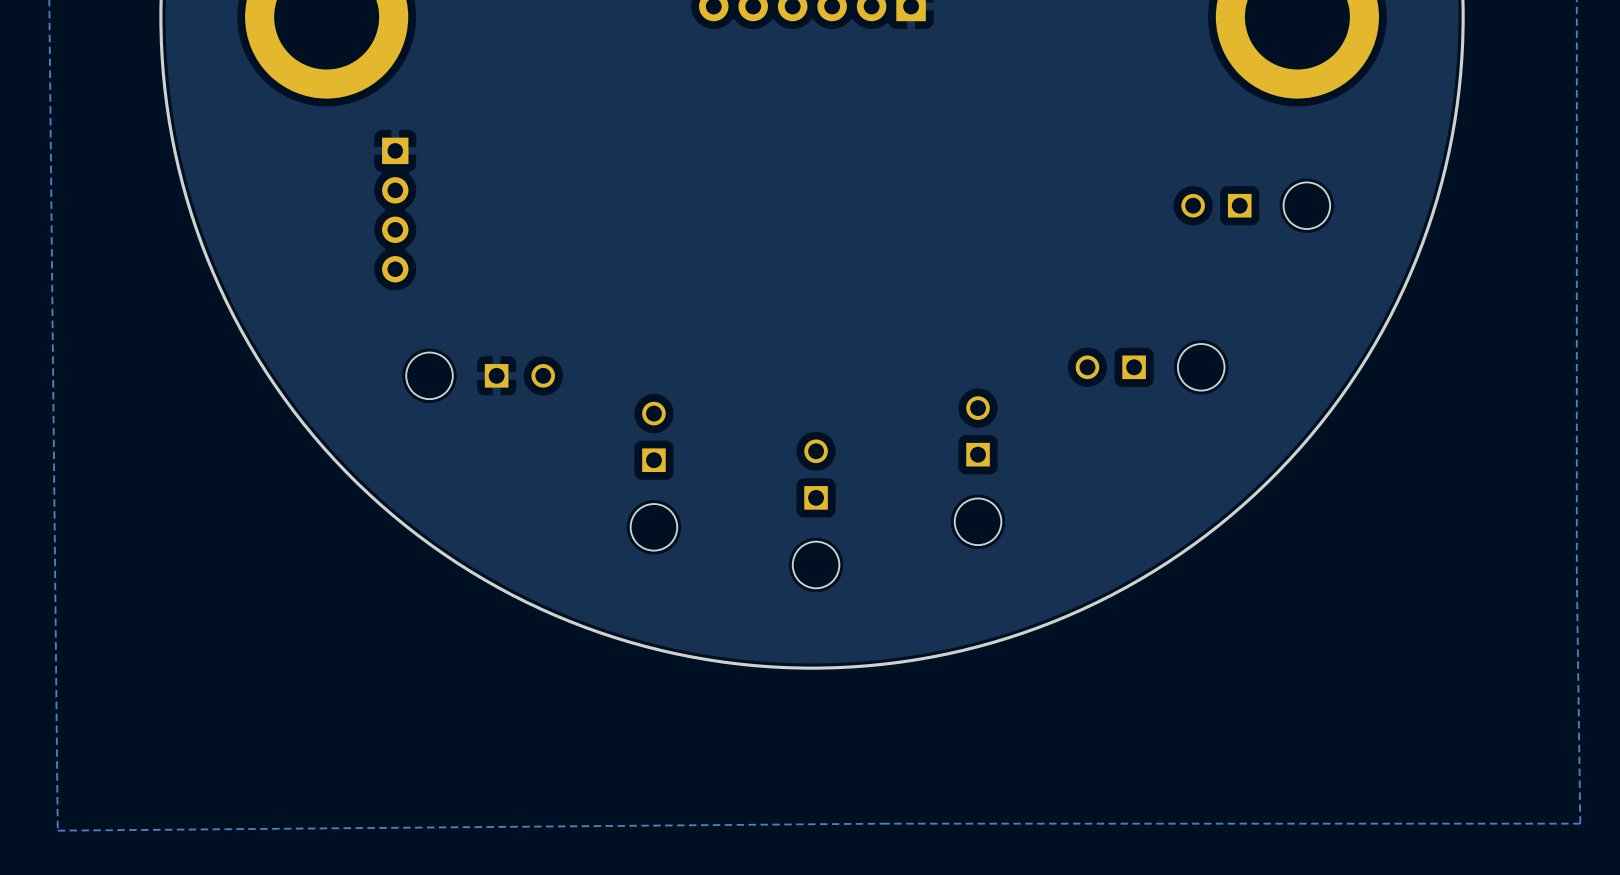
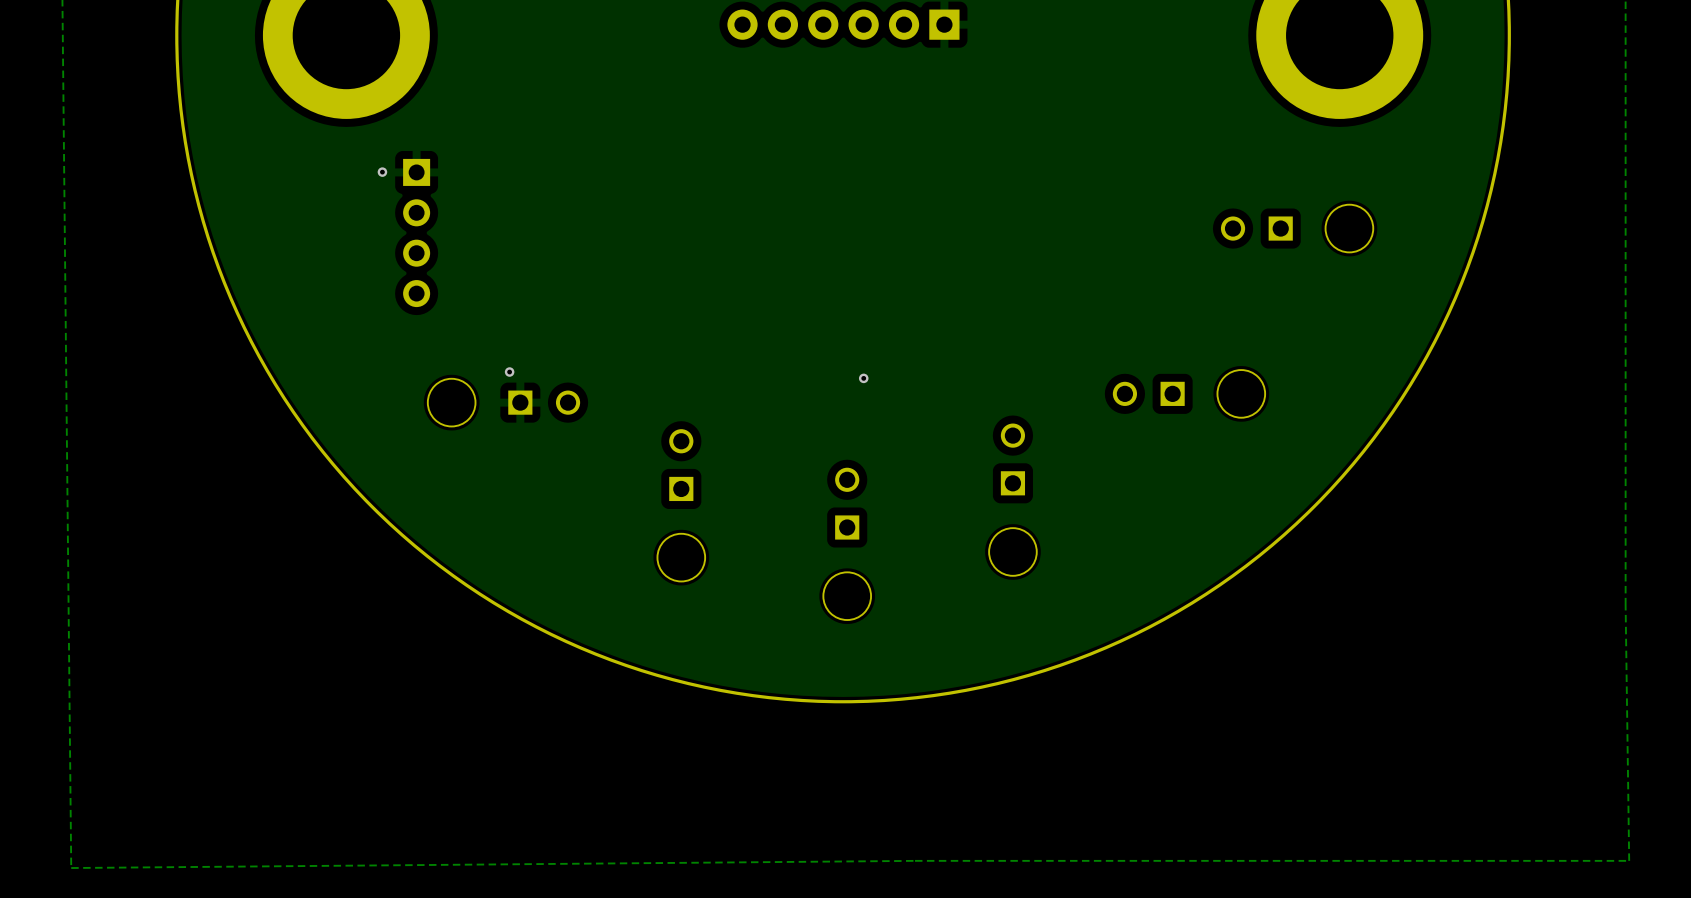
via: none -> (382, 172)
via: none -> (509, 372)
via: none -> (863, 378)

